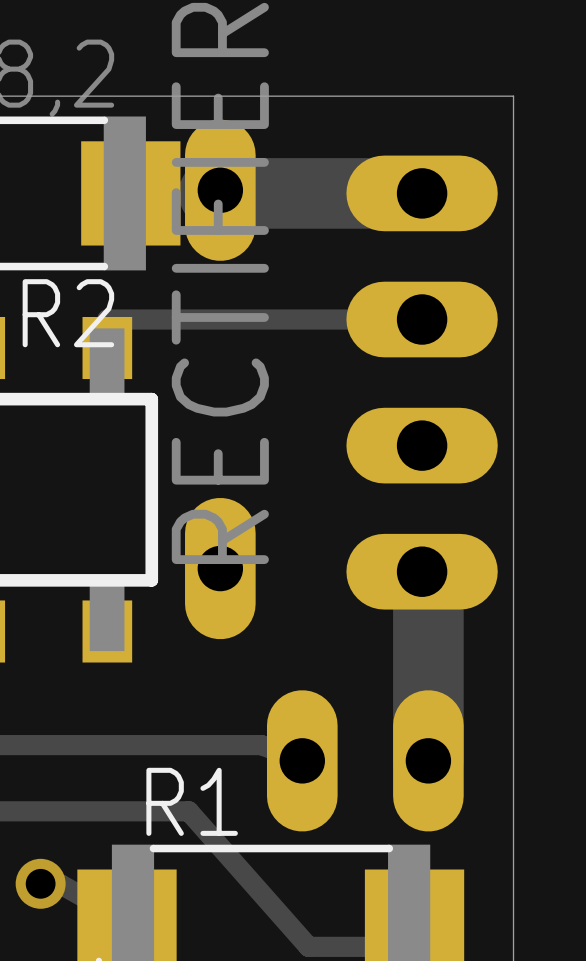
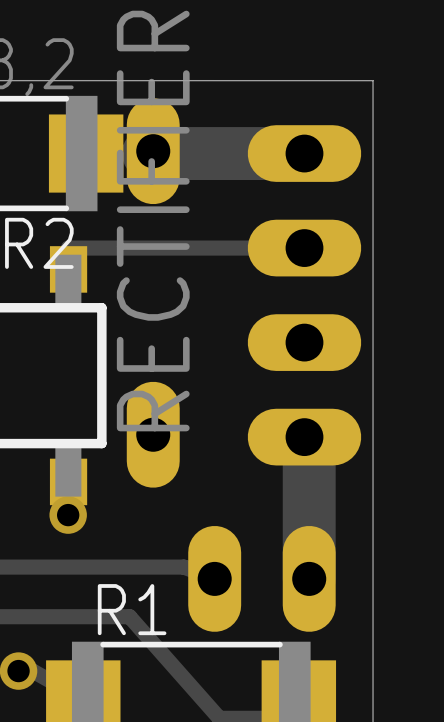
via: none -> (68, 515)

